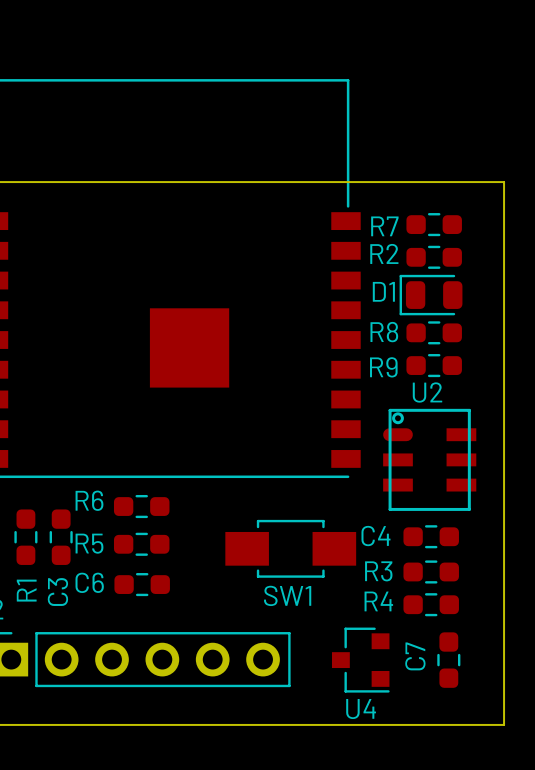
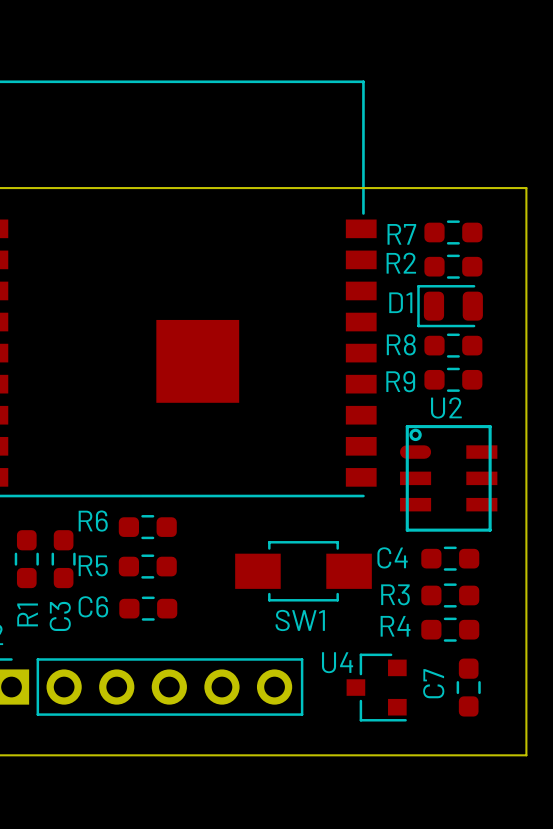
U4 name position: U4 (361, 709) -> U4 (337, 662)

